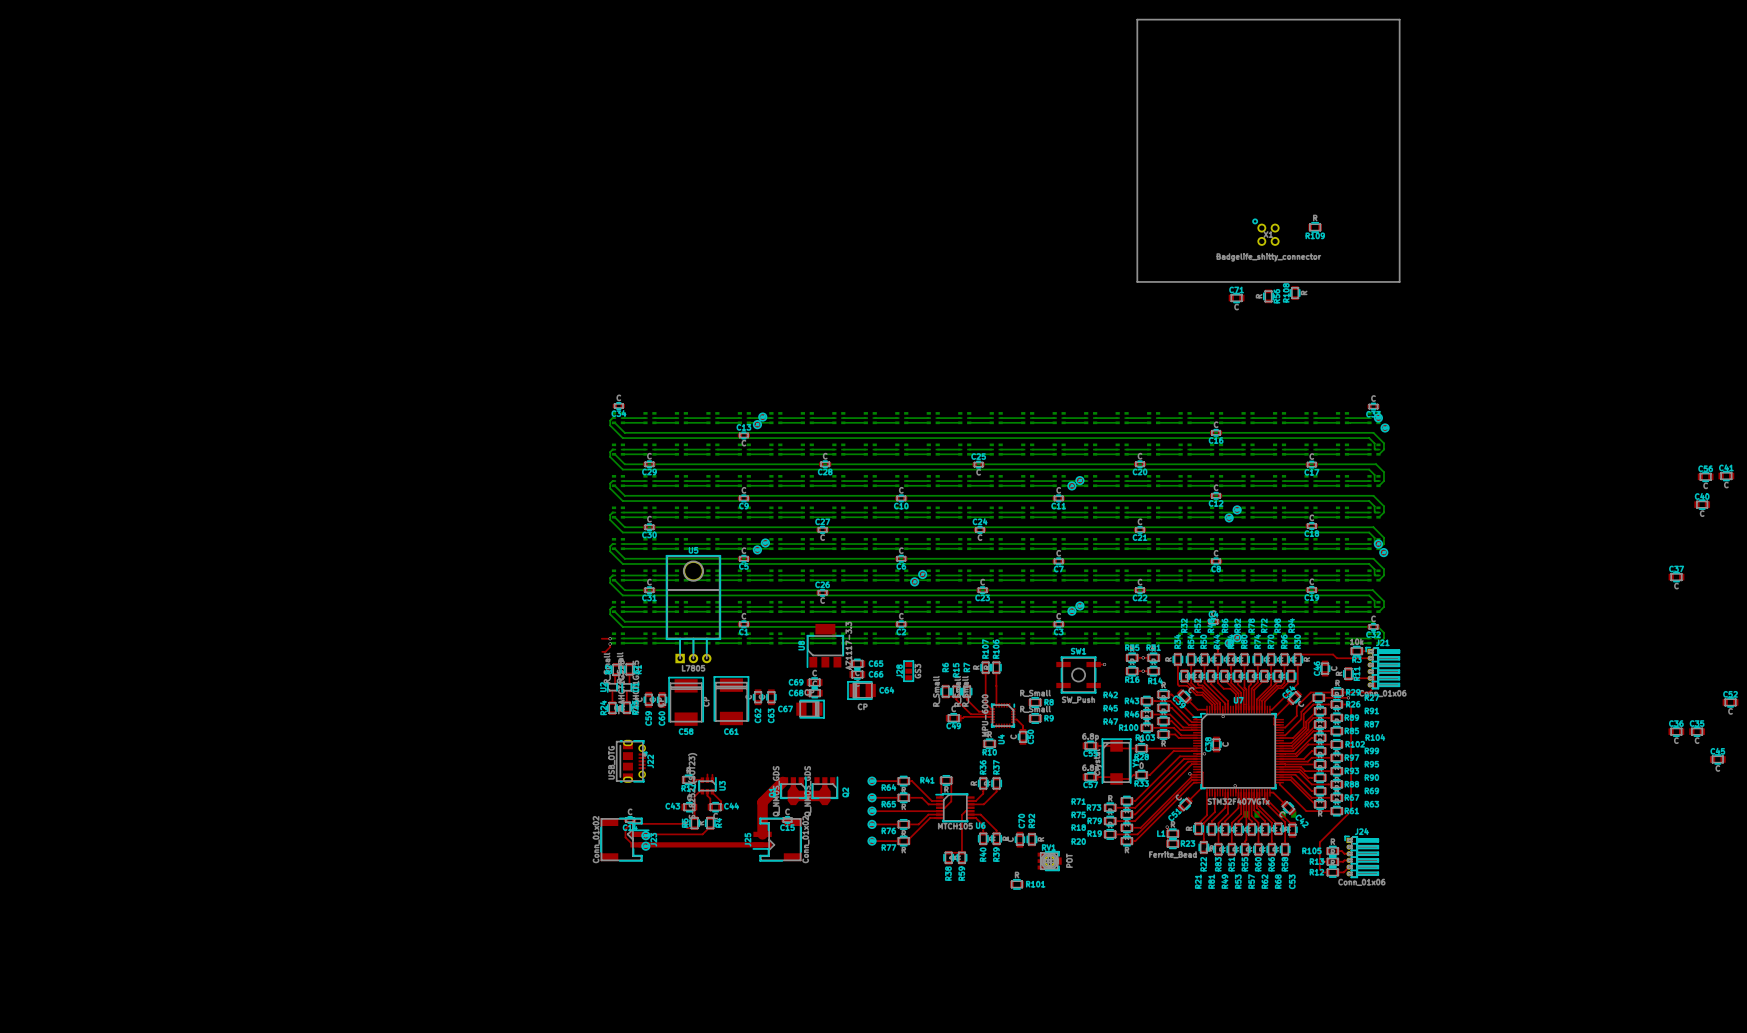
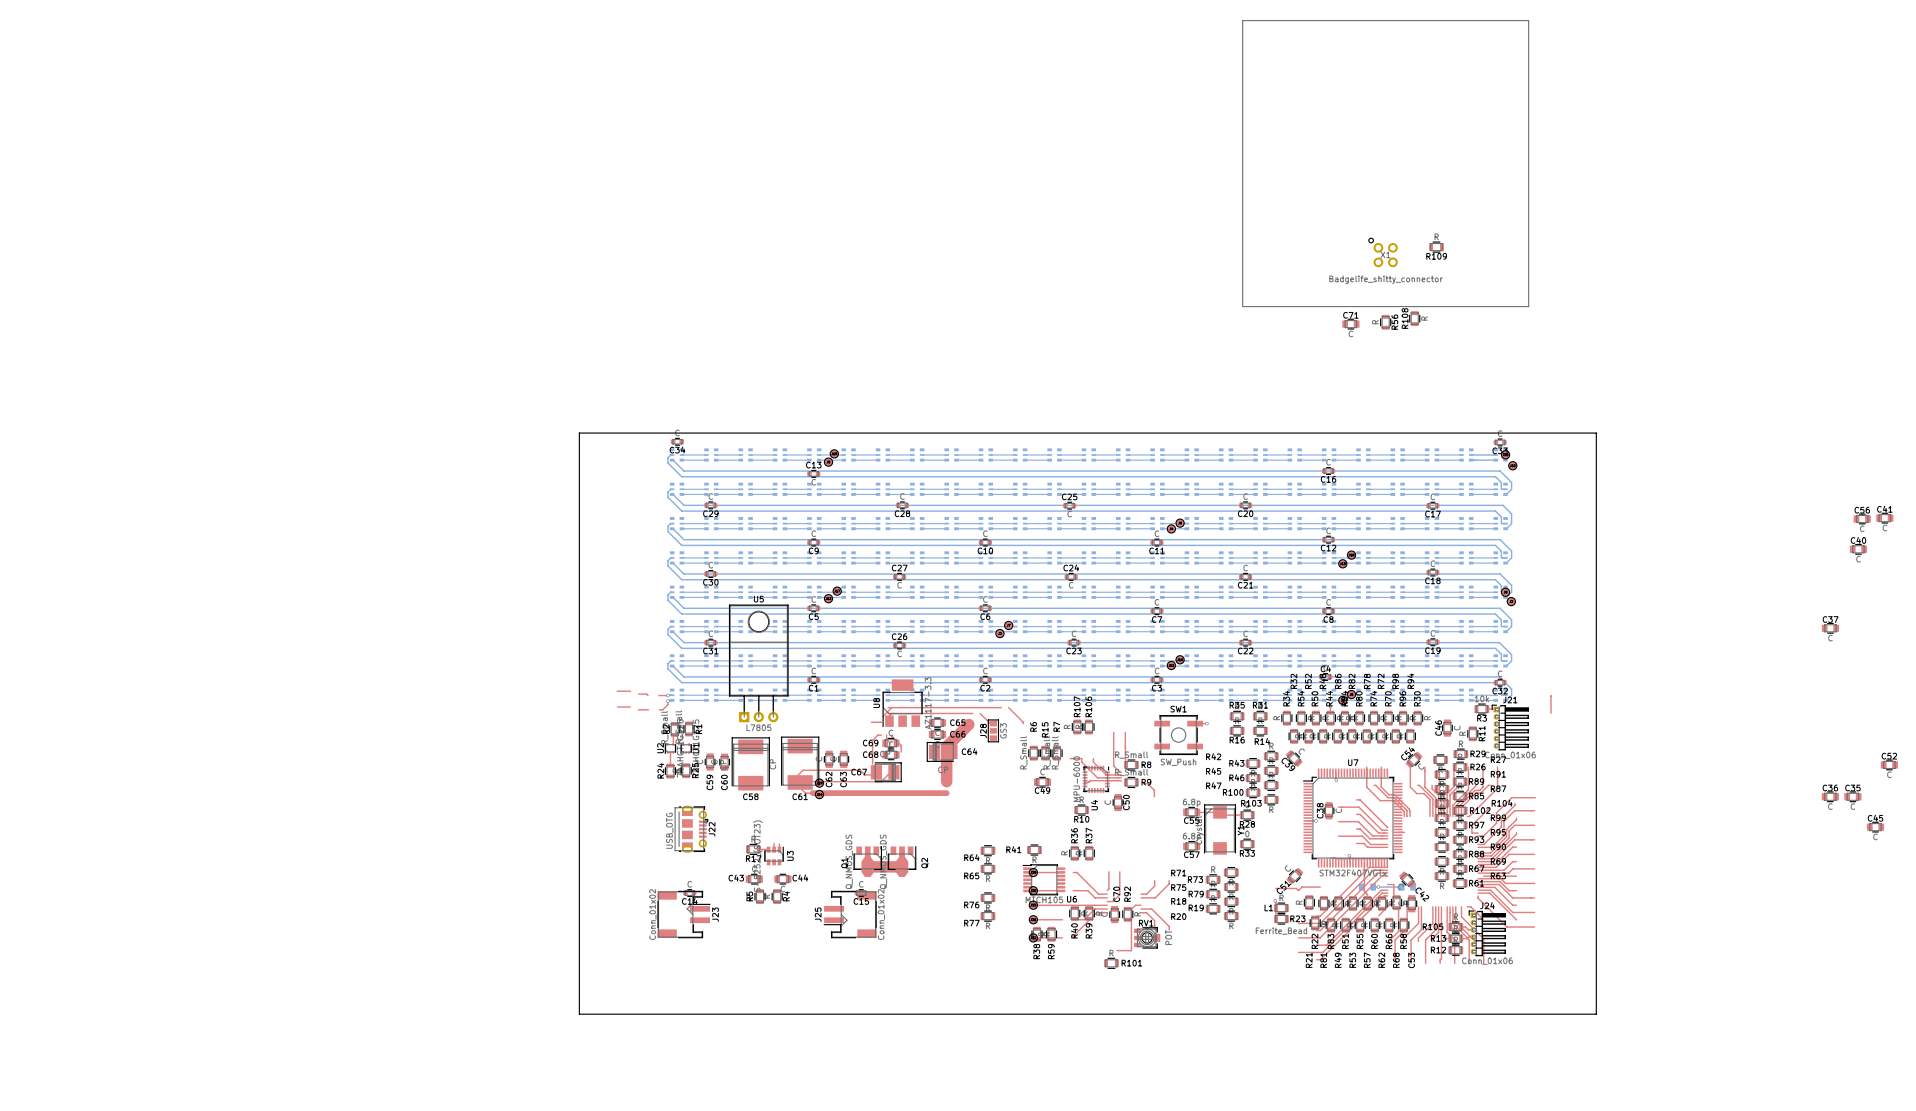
board edge: none -> (579, 433) (579, 1014) (1596, 1014) (1596, 433) (579, 433)
top track: none -> (617, 691) (630, 691)
top track: none -> (638, 694) (648, 695)
top track: none -> (1551, 695) (1551, 713)
top track: none -> (617, 706) (630, 706)
top track: none -> (888, 707) (1001, 707)
top track: none -> (891, 707) (883, 716)
top track: none -> (1008, 707) (1023, 723)
top track: none -> (638, 709) (648, 709)
top track: (1297, 654) (1333, 654) (1336, 658) (1370, 658) -> none
top track: none -> (888, 713) (972, 713)
top track: none -> (891, 713) (888, 716)
top track: none -> (980, 713) (988, 723)
top track: (1137, 657) (1148, 657) -> none
via: (1143, 657) -> none
top track: none -> (871, 722) (881, 722)
top track: none -> (971, 723) (946, 746) (946, 781)
top track: (1177, 664) (1177, 684) (1187, 685) (1196, 695) (1202, 695) (1212, 705) (1212, 709) -> none
top track: (1191, 664) (1191, 682) (1196, 687) (1201, 687) (1217, 703) (1217, 709) -> none
top track: (1204, 664) (1204, 682) (1225, 703) (1225, 709) -> none
top track: (1217, 664) (1217, 682) (1223, 688) (1230, 688) (1235, 694) (1235, 709) -> (1410, 767) (1410, 787) (1416, 793) (1423, 793) (1430, 799) (1430, 816)
top track: (1231, 664) (1231, 682) (1241, 692) (1241, 709) -> (1424, 767) (1424, 787) (1435, 798) (1435, 816)
top track: (1244, 664) (1246, 709) -> (1439, 767) (1441, 816)
top track: (1257, 664) (1257, 682) (1251, 688) (1251, 709) -> (1453, 767) (1453, 786) (1447, 793) (1447, 816)
top track: (1271, 664) (1271, 685) (1256, 699) (1256, 709) -> (1468, 767) (1468, 789) (1452, 805) (1452, 816)
top track: (1284, 664) (1284, 682) (1281, 685) (1277, 685) (1262, 700) (1262, 709) -> (1482, 767) (1482, 787) (1479, 790) (1475, 790) (1458, 806) (1458, 816)
top track: (1297, 664) (1297, 683) (1269, 709) -> (1497, 767) (1497, 788) (1469, 816) (1467, 816)
top track: (1137, 671) (1148, 671) -> none
via: (1143, 671) -> none
top track: (1370, 671) (1374, 675) (1374, 686) (1368, 692) (1342, 692) -> none
top track: (985, 672) (985, 703) (992, 709) -> (1113, 732) (1113, 765) (1121, 772)
top track: (996, 672) (996, 705) -> (1125, 732) (1125, 768)
top track: (629, 674) (629, 683) -> none
top track: none -> (881, 735) (877, 735) (872, 740) (872, 764)
top track: none -> (886, 735) (886, 739) (889, 742) (889, 752)
top track: none -> (892, 735) (901, 745) (901, 752)
top track: (1370, 678) (1348, 678) -> none
top track: (1184, 681) (1197, 692) (1202, 692) (1214, 704) (1214, 709) -> (1374, 785) (1388, 797) (1394, 797) (1406, 810) (1407, 816)
top track: (1197, 681) (1199, 685) (1202, 685) (1220, 702) (1220, 709) -> none
top track: (1211, 681) (1211, 684) (1228, 701) (1228, 709) -> none
top track: (1224, 681) (1238, 693) (1238, 709) -> (1417, 785) (1432, 798) (1432, 816)
top track: (1237, 681) (1237, 684) (1243, 690) (1243, 709) -> (1432, 785) (1432, 788) (1438, 795) (1438, 816)
top track: (1251, 681) (1248, 686) (1248, 709) -> (1446, 785) (1444, 791) (1444, 816)
top track: (1264, 681) (1254, 689) (1254, 709) -> (1461, 785) (1450, 794) (1450, 816)
top track: (1277, 681) (1259, 700) (1259, 709) -> none
top track: (1291, 681) (1282, 688) (1278, 688) (1264, 701) (1264, 709) -> (1490, 785) (1480, 793) (1476, 793) (1461, 807) (1461, 816)
top track: (626, 691) (626, 702) -> none
top track: (1332, 692) (1310, 692) (1296, 706) (1296, 715) (1285, 727) (1279, 727) -> (1535, 797) (1511, 797) (1496, 813) (1496, 823) (1483, 835) (1478, 835)
top track: (1168, 694) (1171, 694) (1197, 719) -> (1356, 799) (1360, 799) (1387, 827)
top track: (945, 696) (956, 696) (956, 699) (970, 714) (992, 714) -> (1070, 758) (1081, 758) (1081, 762) (1097, 777) (1121, 777)
top track: (967, 696) (967, 699) (978, 711) (992, 711) -> (1093, 758) (1093, 762) (1106, 775) (1121, 775)
top track: (1313, 697) (1301, 711) (1301, 719) (1285, 735) (1279, 735) -> (1514, 803) (1501, 818) (1501, 826) (1483, 844) (1478, 844)
top track: (1323, 697) (1348, 697) -> none
via: (1348, 697) -> none
top track: (1188, 700) (1197, 709) (1207, 709) -> none
top track: (1151, 701) (1170, 701) (1191, 722) (1197, 722) -> (1338, 807) (1358, 807) (1381, 830) (1387, 830)
top track: (1290, 701) (1274, 717) (1274, 724) (1279, 724) -> (1489, 807) (1471, 825) (1471, 832) (1478, 833)
top track: none -> (1366, 767) (1366, 787) (1380, 800) (1393, 800) (1404, 811) (1404, 816)
top track: none -> (1381, 767) (1381, 787) (1388, 794) (1394, 794) (1409, 809) (1409, 816)
top track: (1331, 704) (1313, 704) (1303, 714) (1303, 727) (1293, 738) (1279, 738) -> (1534, 810) (1514, 810) (1503, 821) (1503, 835) (1492, 847) (1478, 847)
top track: (1341, 704) (1348, 704) (1351, 707) (1351, 721) -> none
top track: (1168, 707) (1171, 707) (1188, 724) (1197, 724) -> (1356, 814) (1360, 814) (1378, 833) (1387, 833)
top track: none -> (872, 774) (864, 774) (860, 770) (803, 770) (797, 775) (797, 784) (805, 793) (946, 793)
top track: none -> (889, 774) (881, 781) (812, 781)
top track: (1315, 711) (1306, 721) (1306, 728) (1291, 743) (1279, 743) -> (1516, 818) (1506, 829) (1506, 836) (1490, 853) (1478, 853)
top track: (1151, 714) (1170, 714) (1183, 727) (1197, 727) -> (1338, 821) (1358, 821) (1372, 835) (1387, 835)
top track: (992, 716) (958, 718) -> (1121, 780) (1084, 782)
top track: (1331, 717) (1313, 717) (1308, 722) (1308, 729) (1291, 745) (1279, 745) -> (1534, 825) (1514, 825) (1509, 830) (1509, 837) (1491, 855) (1478, 855)
top track: (1013, 719) (1016, 719) (1023, 725) (1023, 731) -> (1143, 783) (1147, 783) (1154, 790) (1154, 796)
top track: (1168, 721) (1171, 721) (1180, 730) (1197, 730) -> (1356, 828) (1360, 828) (1369, 838) (1387, 838)
top track: (1351, 721) (1351, 811) (1319, 842) (1319, 869) (1323, 872) (1327, 872) -> (1475, 786) (1455, 806) (1455, 816)
top track: (1315, 724) (1306, 734) -> (1516, 832) (1507, 843)
top track: (1151, 727) (1173, 727) (1181, 735) (1197, 735) -> (1338, 836) (1362, 836) (1370, 844) (1387, 844)
top track: (1331, 731) (1313, 731) (1293, 751) (1279, 751) -> (1534, 839) (1514, 839) (1492, 861) (1478, 861)
top track: (1168, 734) (1175, 734) (1178, 738) (1197, 738) -> (1356, 843) (1363, 843) (1367, 847) (1387, 847)
top track: (1306, 734) (1292, 748) (1279, 748) -> (1507, 843) (1492, 858) (1478, 858)
top track: (1315, 737) (1311, 737) (1295, 753) (1279, 753) -> (1516, 847) (1512, 847) (1495, 864) (1478, 864)
top track: (1331, 744) (1308, 744) (1296, 756) (1279, 756) -> (1534, 854) (1509, 854) (1496, 867) (1478, 867)
top track: (1146, 748) (1197, 748) -> none
top track: (1197, 751) (1173, 751) (1149, 775) (1146, 775) -> none
top track: (1315, 751) (1311, 751) (1303, 759) (1279, 759) -> (1516, 861) (1512, 861) (1504, 870) (1478, 870)
top track: (1197, 756) (1179, 756) (1135, 801) (1131, 801) -> (1387, 867) (1369, 867) (1320, 916) (1316, 916)
top track: (1331, 757) (1311, 757) (1307, 761) (1279, 761) -> (1534, 868) (1512, 868) (1508, 873) (1478, 873)
top track: (1197, 759) (1183, 759) (1135, 807) (1115, 807) -> (1387, 870) (1373, 870) (1320, 923) (1298, 923)
top track: (1197, 761) (1188, 761) (1135, 814) (1131, 814) -> (1387, 873) (1377, 873) (1320, 930) (1316, 930)
top track: (1197, 764) (1191, 764) (1135, 821) (1115, 821) -> (1387, 875) (1381, 875) (1320, 937) (1298, 937)
top track: (1285, 764) (1315, 764) -> (1483, 876) (1516, 876)
top track: (1279, 766) (1300, 766) (1305, 771) (1331, 771) -> (1478, 878) (1500, 878) (1505, 883) (1534, 883)
top track: (1279, 769) (1300, 769) (1308, 777) (1315, 777) -> (1478, 881) (1500, 881) (1509, 890) (1516, 890)
top track: (1197, 772) (1202, 772) (1202, 786) (1188, 800) -> (1387, 884) (1393, 884) (1393, 900) (1378, 915)
top track: (1279, 772) (1299, 772) (1311, 784) (1331, 784) -> (1478, 884) (1499, 884) (1512, 897) (1534, 897)
top track: (1189, 773) (1197, 774) -> none
via: (1189, 773) -> none
top track: (1279, 774) (1295, 774) (1311, 791) (1315, 791) -> (1478, 887) (1494, 887) (1512, 905) (1516, 905)
top track: (1136, 775) (1133, 775) (1129, 779) (1116, 778) -> none
top track: (1095, 777) (1114, 777) (1116, 778) -> none
top track: (1197, 777) (1191, 777) (1140, 827) (1131, 827) -> (1387, 890) (1381, 890) (1326, 945) (1316, 945)
top track: (1279, 777) (1291, 777) (1311, 797) (1331, 797) -> (1478, 890) (1490, 890) (1512, 912) (1534, 912)
top track: (1197, 779) (1191, 779) (1137, 834) (1115, 834) -> (1387, 893) (1382, 893) (1322, 952) (1298, 952)
top track: (1279, 779) (1290, 779) (1315, 804) -> (1478, 893) (1489, 893) (1516, 919)
top track: (941, 780) (939, 797) -> (1108, 871) (1107, 890)
top track: (951, 780) (951, 801) (944, 807) (939, 807) -> (1119, 871) (1119, 894) (1112, 901) (1107, 901)
top track: (785, 781) (762, 802) (762, 834) -> none
top track: (872, 781) (898, 781) -> (1033, 872) (1062, 872)
part position: (872, 781) -> (1033, 872)
top track: (908, 781) (912, 781) (931, 800) (939, 800) -> (1073, 872) (1076, 872) (1098, 894) (1107, 894)
top track: (1197, 782) (1193, 782) (1135, 841) (1131, 841) -> (1387, 895) (1384, 895) (1320, 959) (1316, 959)
top track: (1279, 782) (1306, 811) (1331, 811) -> (1478, 895) (1478, 898) (1506, 927) (1534, 927)
top track: none -> (1331, 858) (1387, 858)
top track: (983, 788) (983, 793) (975, 800) (970, 800) -> (1154, 880) (1154, 886) (1146, 894) (1141, 894)
top track: (996, 788) (996, 791) (983, 804) (970, 804) -> (1169, 880) (1169, 883) (1155, 897) (1141, 897)
top track: (702, 791) (699, 791) (694, 796) (694, 818) -> none
top track: (707, 791) (707, 795) (710, 798) (710, 807) -> none
top track: (712, 791) (720, 801) (720, 807) -> none
top track: (1207, 792) (1207, 815) (1198, 823) -> (1398, 906) (1398, 931) (1389, 940)
top track: (1214, 792) (1214, 812) (1203, 823) (1203, 842) -> (1407, 906) (1407, 928) (1395, 940) (1395, 961)
top track: (1225, 792) (1225, 807) (1211, 821) (1211, 824) -> (1418, 906) (1418, 923) (1403, 938) (1403, 941)
top track: (1228, 792) (1228, 813) (1218, 823) (1218, 844) -> (1421, 906) (1421, 929) (1411, 940) (1411, 963)
top track: (1238, 792) (1238, 807) (1225, 821) (1225, 824) -> (1432, 906) (1432, 923) (1418, 938) (1418, 941)
top track: (1241, 792) (1241, 813) (1231, 823) (1231, 844) -> (1435, 906) (1435, 929) (1425, 940) (1425, 963)
top track: (1243, 792) (1243, 816) (1238, 821) (1238, 824) -> (1438, 906) (1438, 932) (1432, 938) (1432, 941)
top track: (1246, 792) (1245, 844) -> (1441, 906) (1440, 963)
top track: (1251, 792) (1251, 815) (1258, 822) (1258, 844) -> (1447, 906) (1447, 932) (1454, 939) (1454, 963)
top track: (1254, 792) (1254, 810) (1265, 821) (1265, 824) -> (1450, 906) (1450, 926) (1461, 938) (1461, 941)
top track: (1256, 792) (1256, 807) (1271, 822) (1271, 844) -> (1452, 906) (1452, 923) (1469, 939) (1469, 963)
top track: (1259, 792) (1259, 806) (1278, 823) -> (1455, 906) (1455, 921) (1476, 940)
top track: (1264, 792) (1264, 801) (1285, 822) (1285, 844) -> (1461, 906) (1461, 916) (1483, 939) (1483, 963)
top track: (1267, 792) (1267, 800) (1292, 824) -> none
top track: (1269, 792) (1273, 792) (1284, 804) -> (1467, 906) (1470, 906) (1483, 919)
top track: (872, 797) (898, 797) -> (1033, 890) (1062, 890)
part position: (872, 797) -> (1033, 890)
top track: (908, 797) (921, 797) (928, 804) (939, 804) -> (1073, 890) (1087, 890) (1095, 897) (1107, 897)
top track: (872, 811) (939, 811) -> (1033, 905) (1107, 905)
part position: (872, 811) -> (1033, 905)
top track: (970, 811) (965, 811) (961, 814) (961, 852) (948, 852) -> (1141, 905) (1135, 905) (1131, 909) (1131, 950) (1116, 950)
top track: (939, 814) (928, 814) (918, 824) (908, 824) -> (1107, 909) (1094, 909) (1084, 919) (1073, 919)
top track: (970, 814) (980, 814) (996, 830) (996, 833) -> (1141, 909) (1151, 909) (1169, 926) (1169, 929)
top track: none -> (1320, 887) (1301, 887) (1298, 890) (1296, 888) (1275, 888)
bottom track: none -> (1373, 887) (1401, 887)
via: none -> (1378, 887)
top track: (939, 818) (930, 818) (908, 841) -> (1107, 912) (1096, 912) (1073, 937)
top track: (970, 818) (975, 818) (983, 825) (983, 833) -> (1141, 912) (1146, 912) (1154, 920) (1154, 929)
top track: (872, 824) (898, 824) -> (1033, 919) (1062, 919)
part position: (872, 824) -> (1033, 919)
top track: (694, 828) (687, 828) (683, 823) (630, 823) (625, 829) (625, 837) (632, 844) (762, 844) -> none
top track: (710, 828) (702, 834) (639, 834) -> none
part position: (645, 835) -> (819, 783)
top track: (872, 841) (898, 841) -> (1033, 937) (1062, 937)
part position: (872, 841) -> (1033, 937)
part position: (645, 846) -> (819, 794)
top track: (1349, 867) (1343, 872) (1337, 872) -> none

